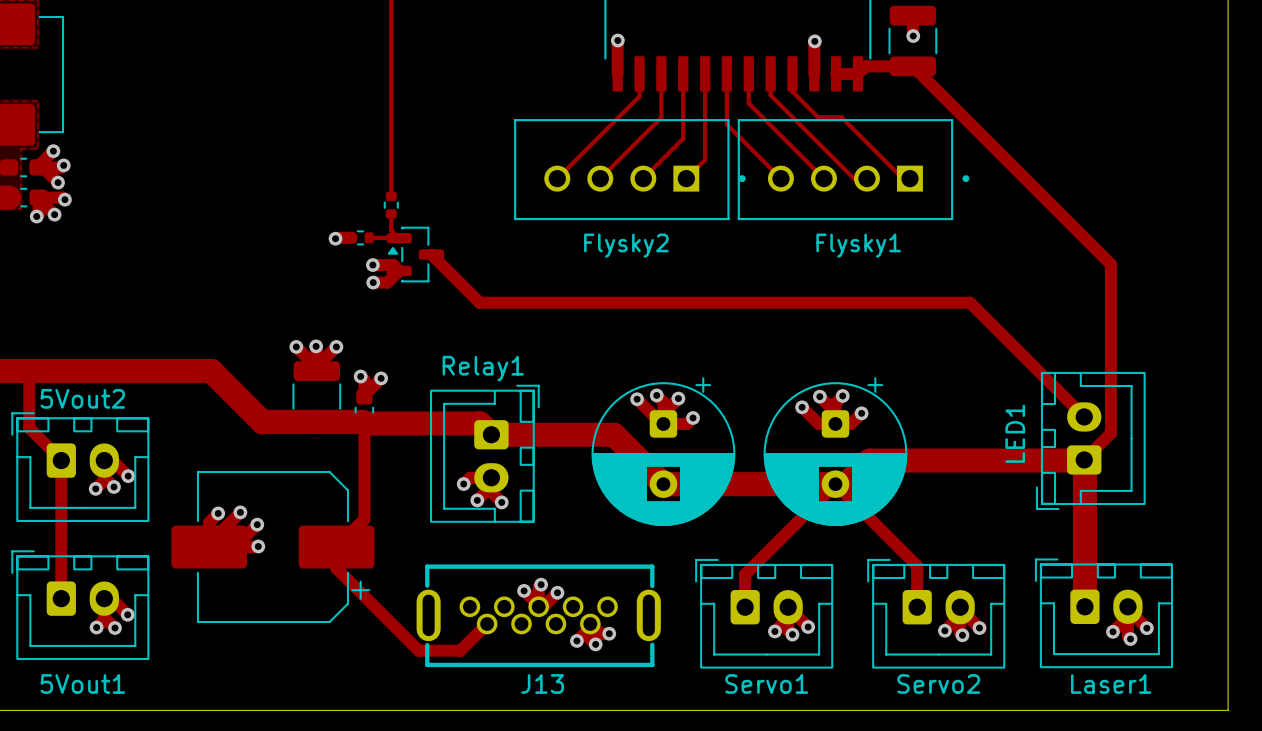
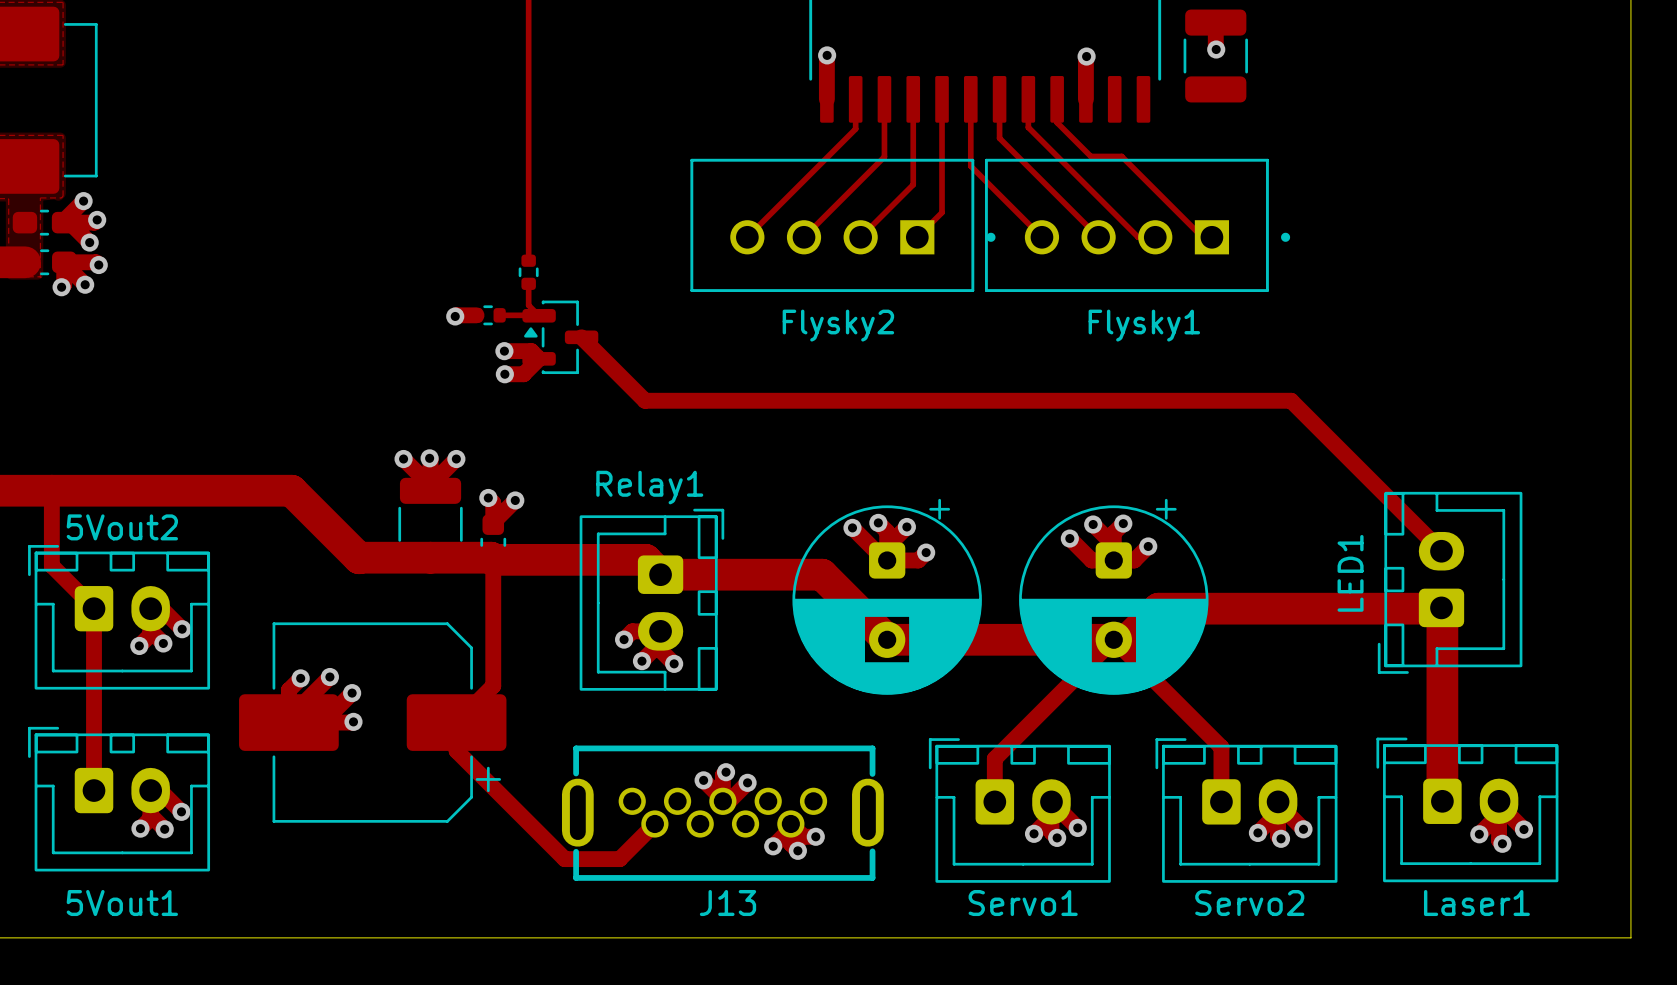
track: (836, 73) (858, 73) (865, 66) (912, 66) (1110, 264) (1110, 433) (1084, 459) -> none

